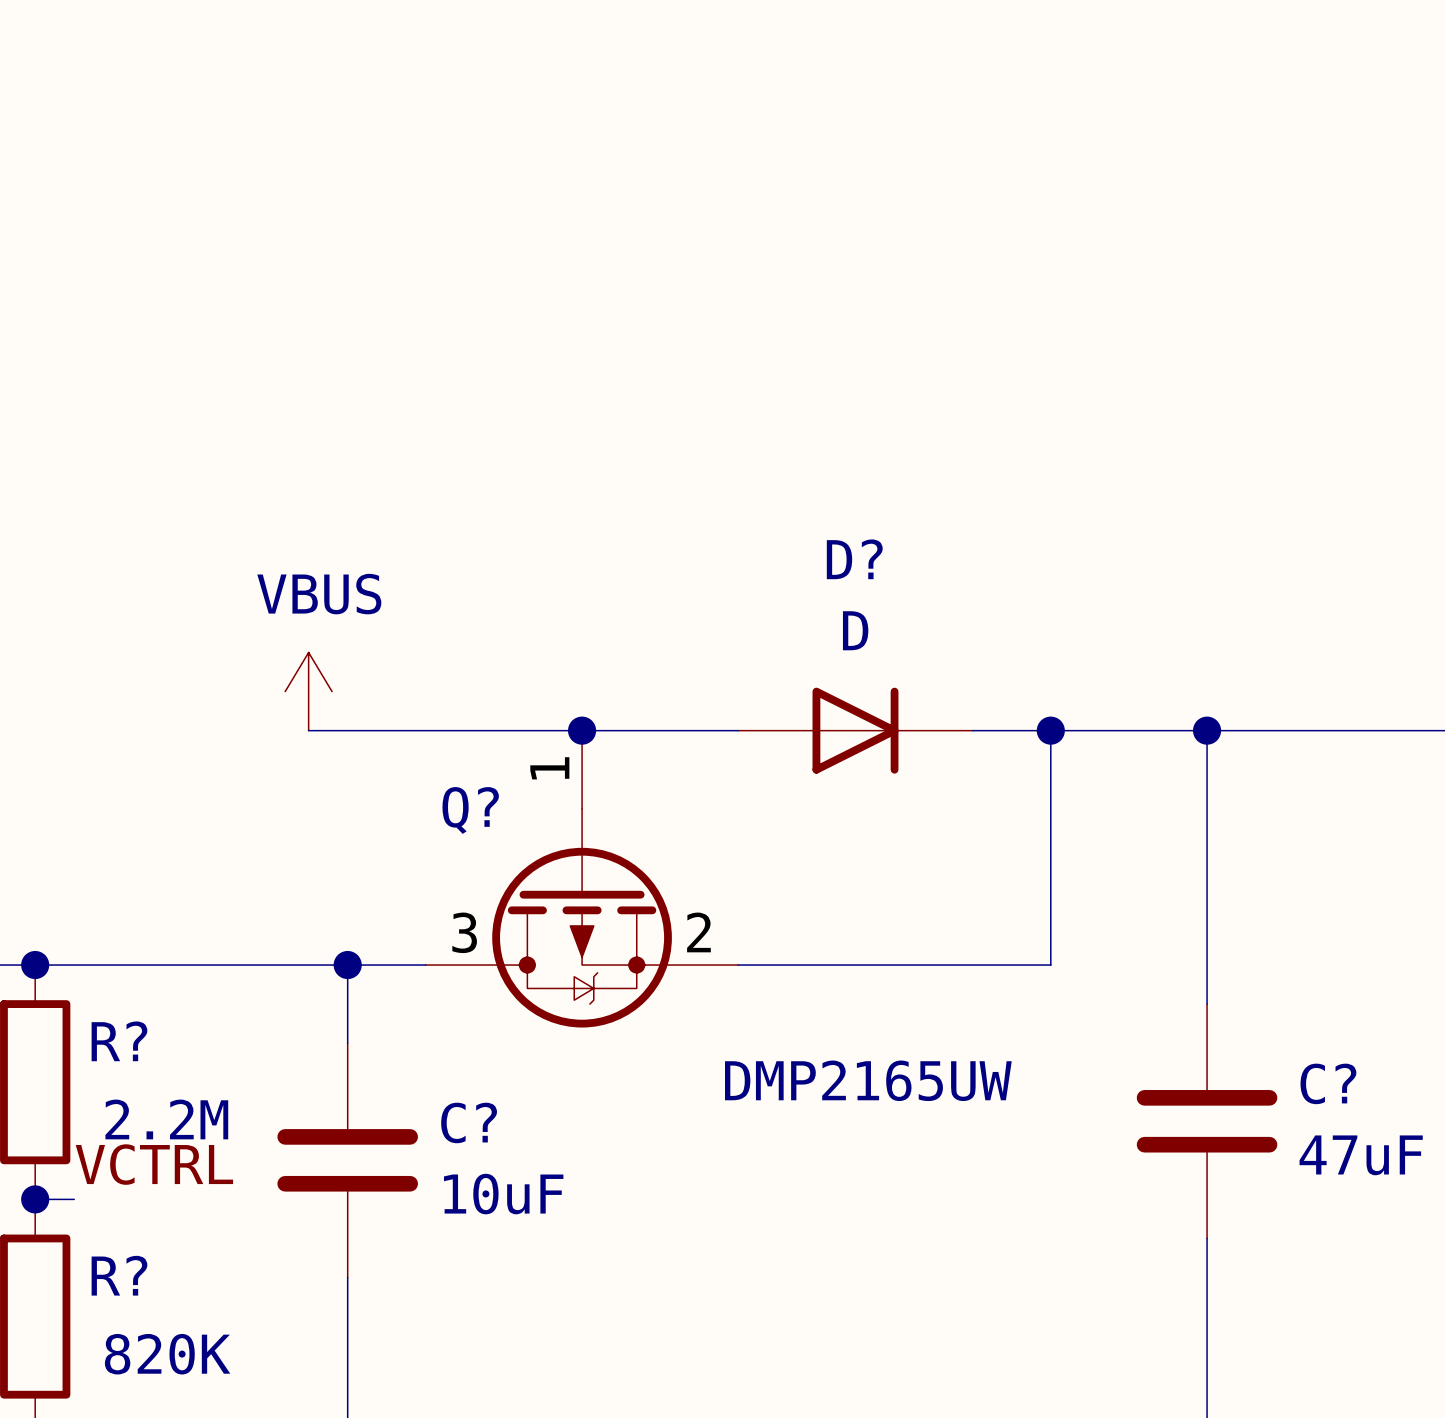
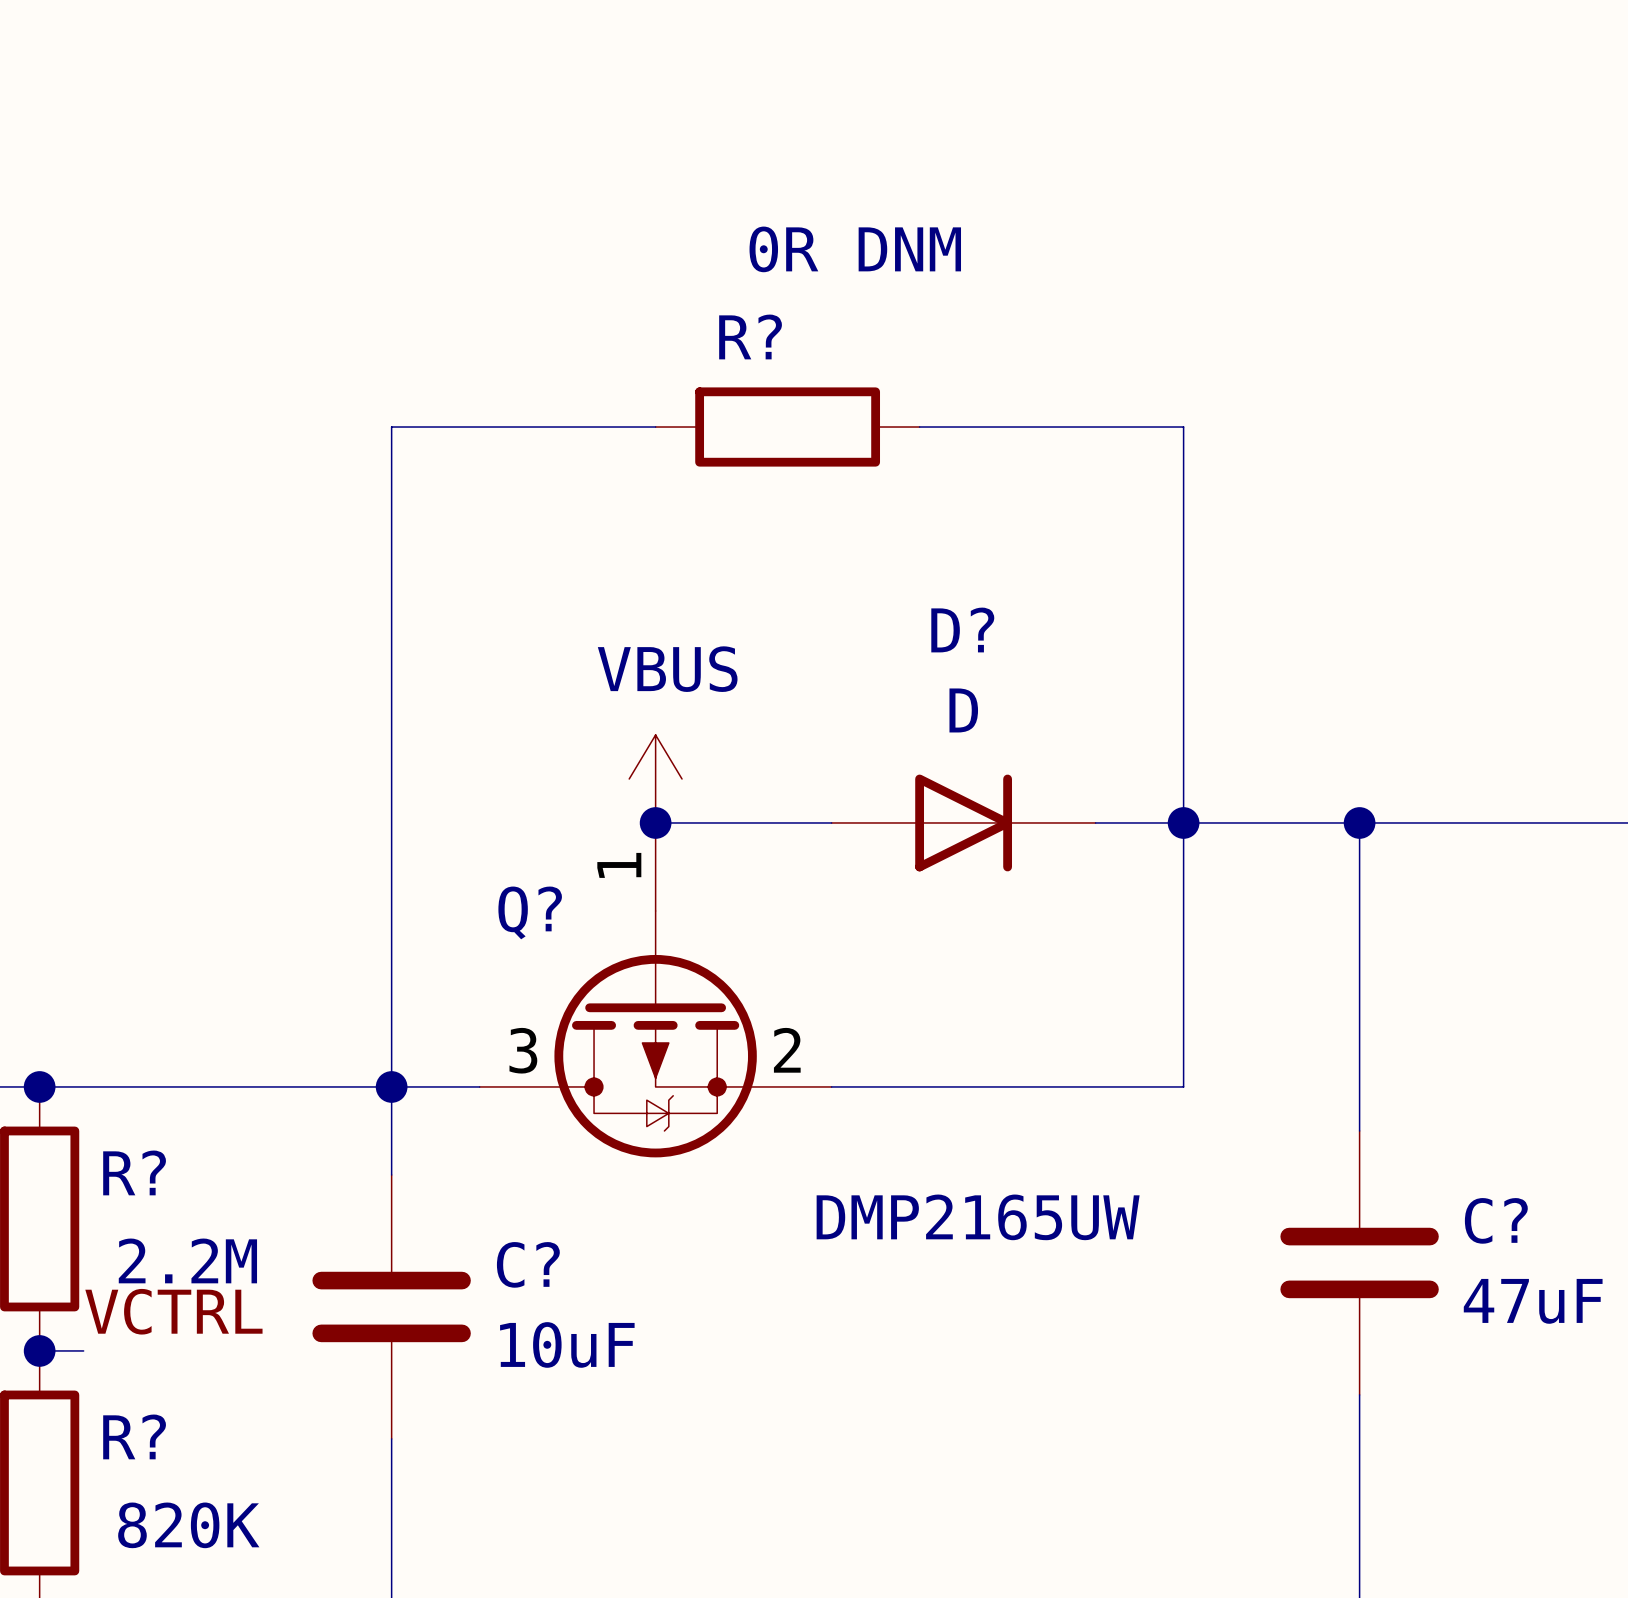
wire: none -> (655, 427) (391, 427) (391, 1086)
R?: none -> 0R DNM (787, 427)
wire: none -> (919, 427) (1183, 427) (1183, 822)
power symbol position: VBUS (308, 691) -> VBUS (655, 778)
wire: (308, 730) (582, 730) -> none

